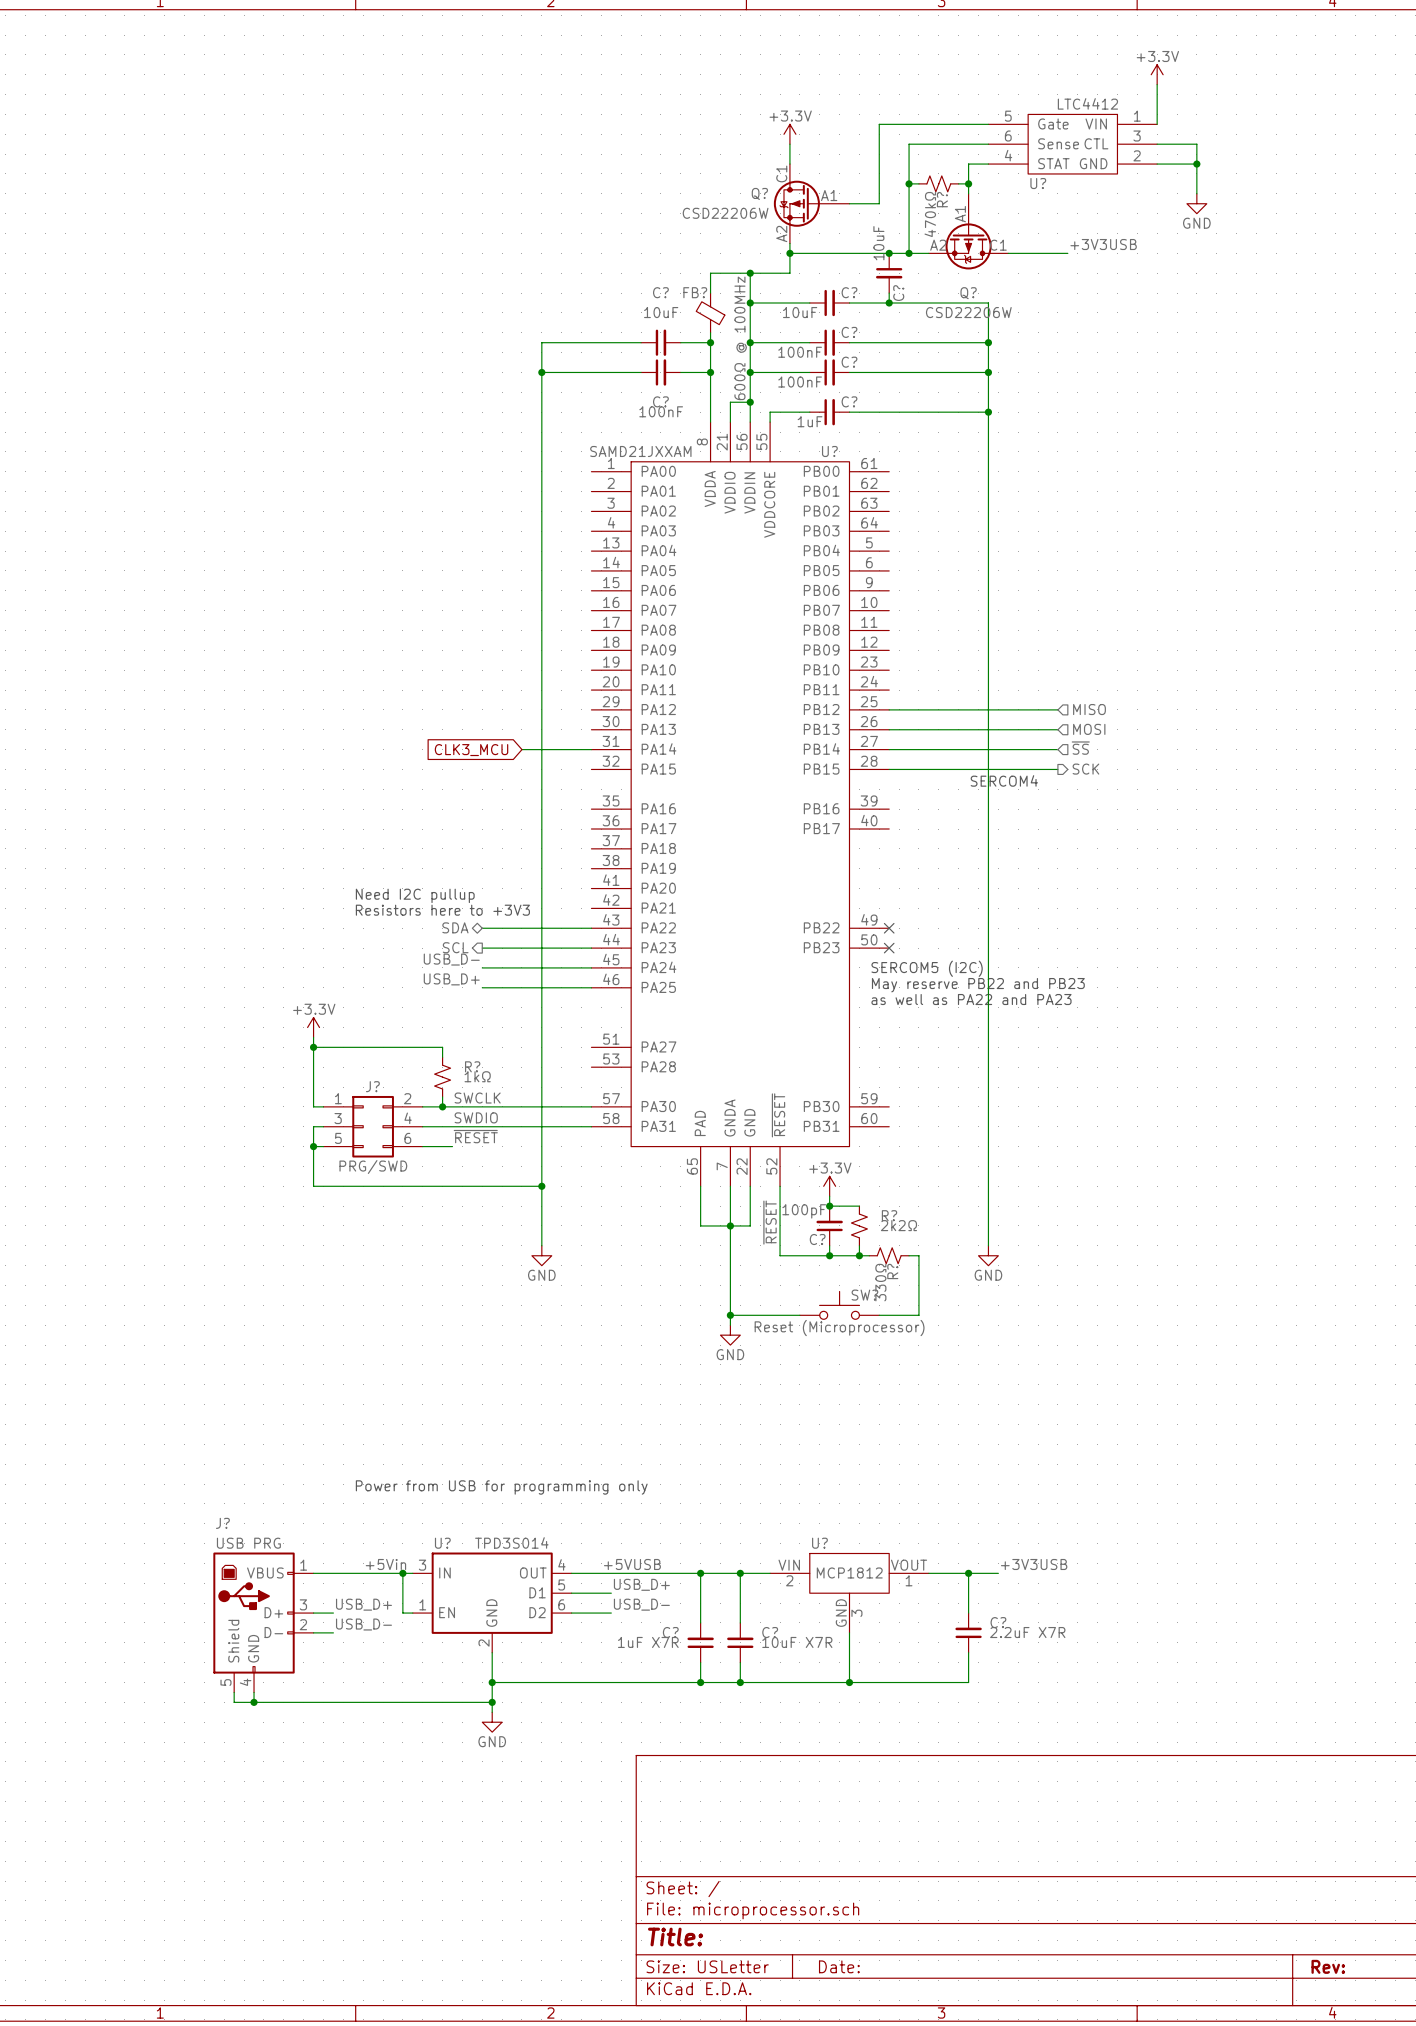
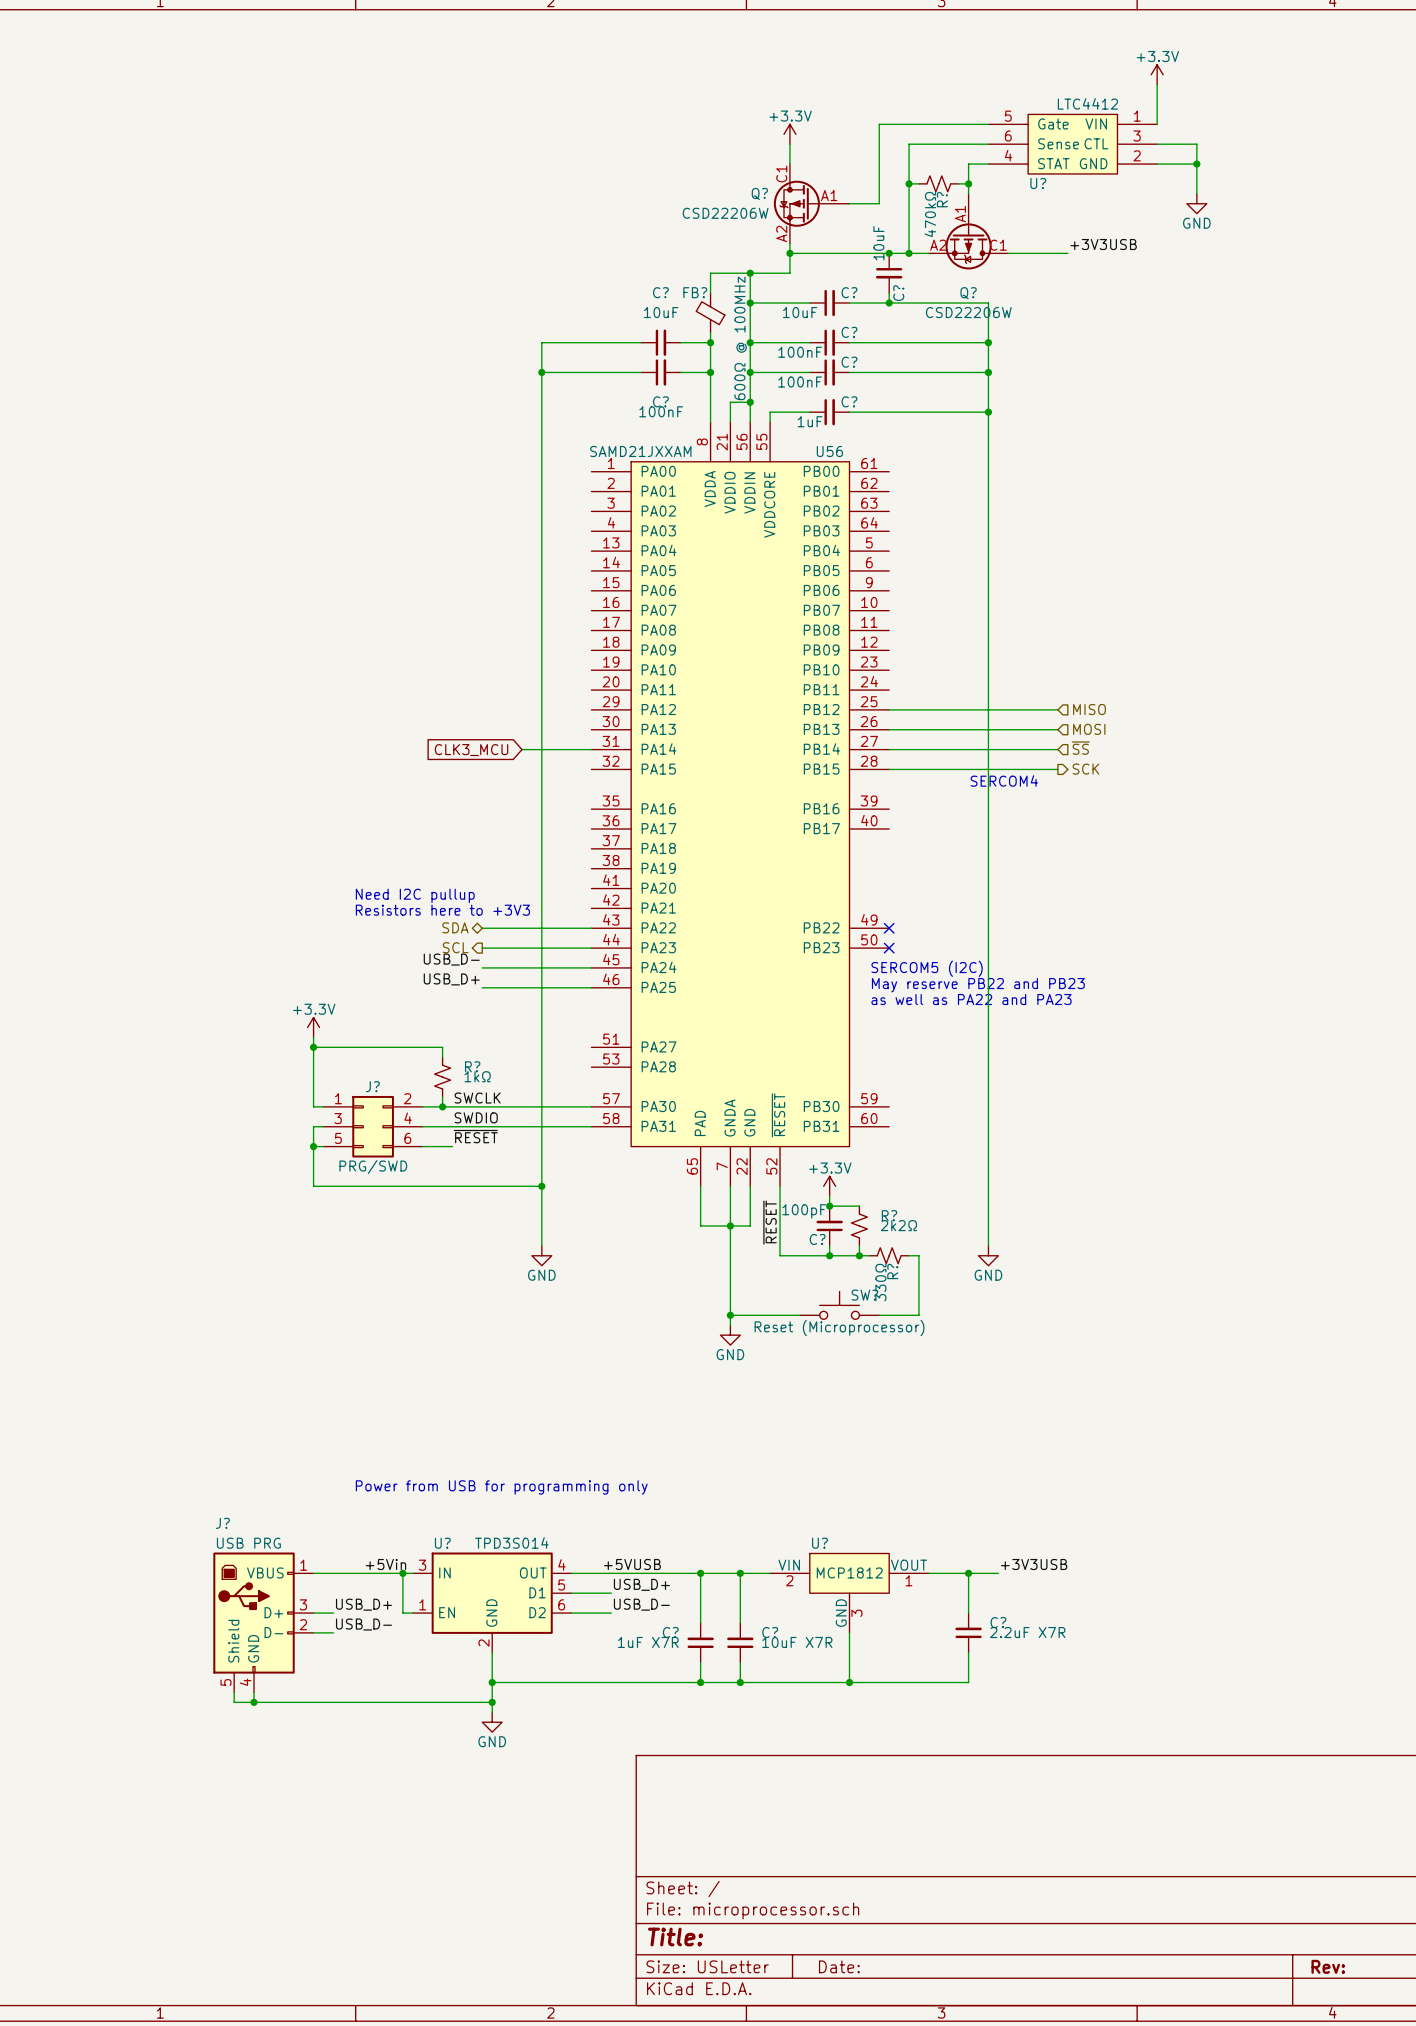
U? name: U? (829, 451) -> U56 (829, 451)

